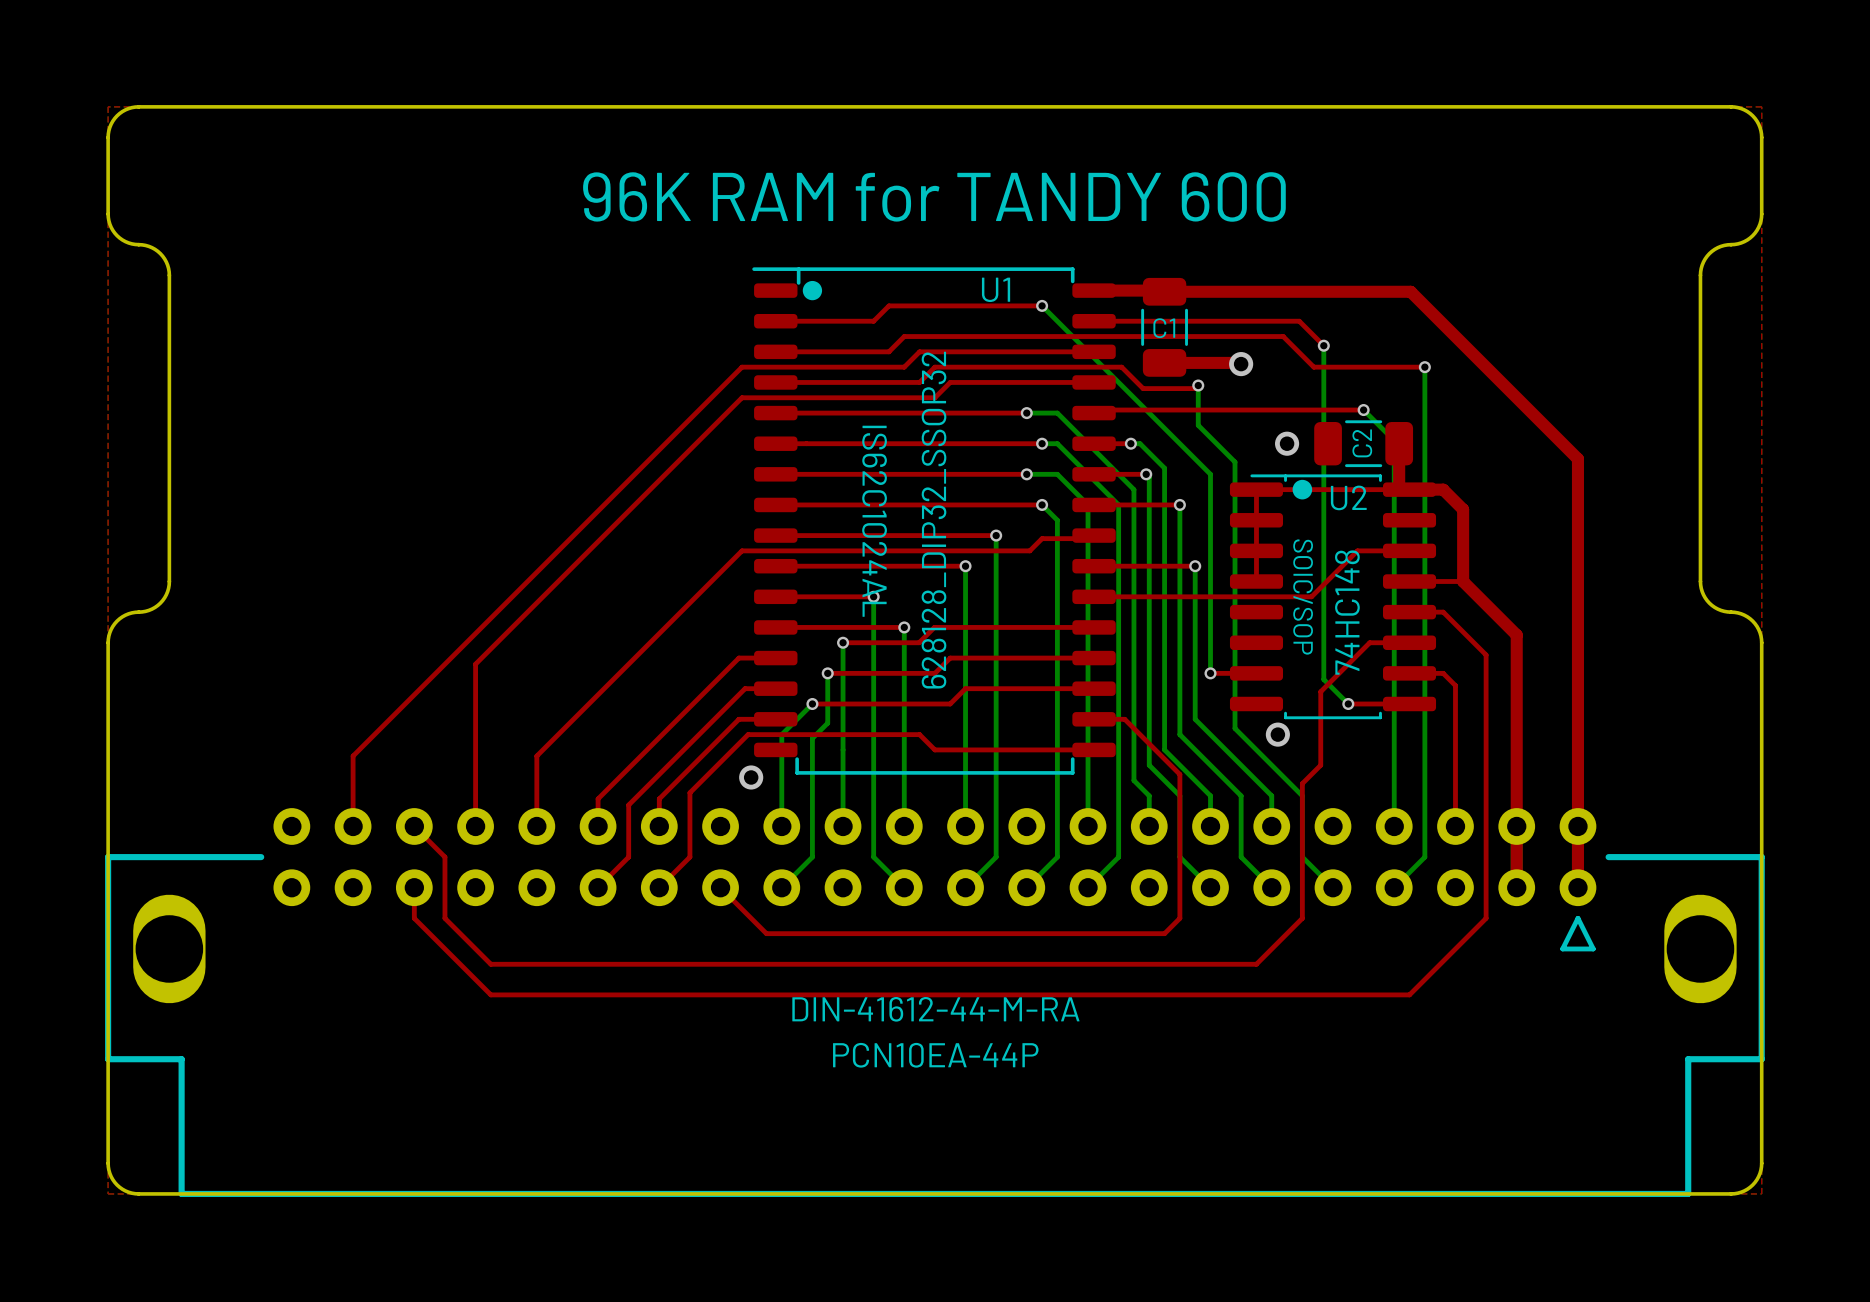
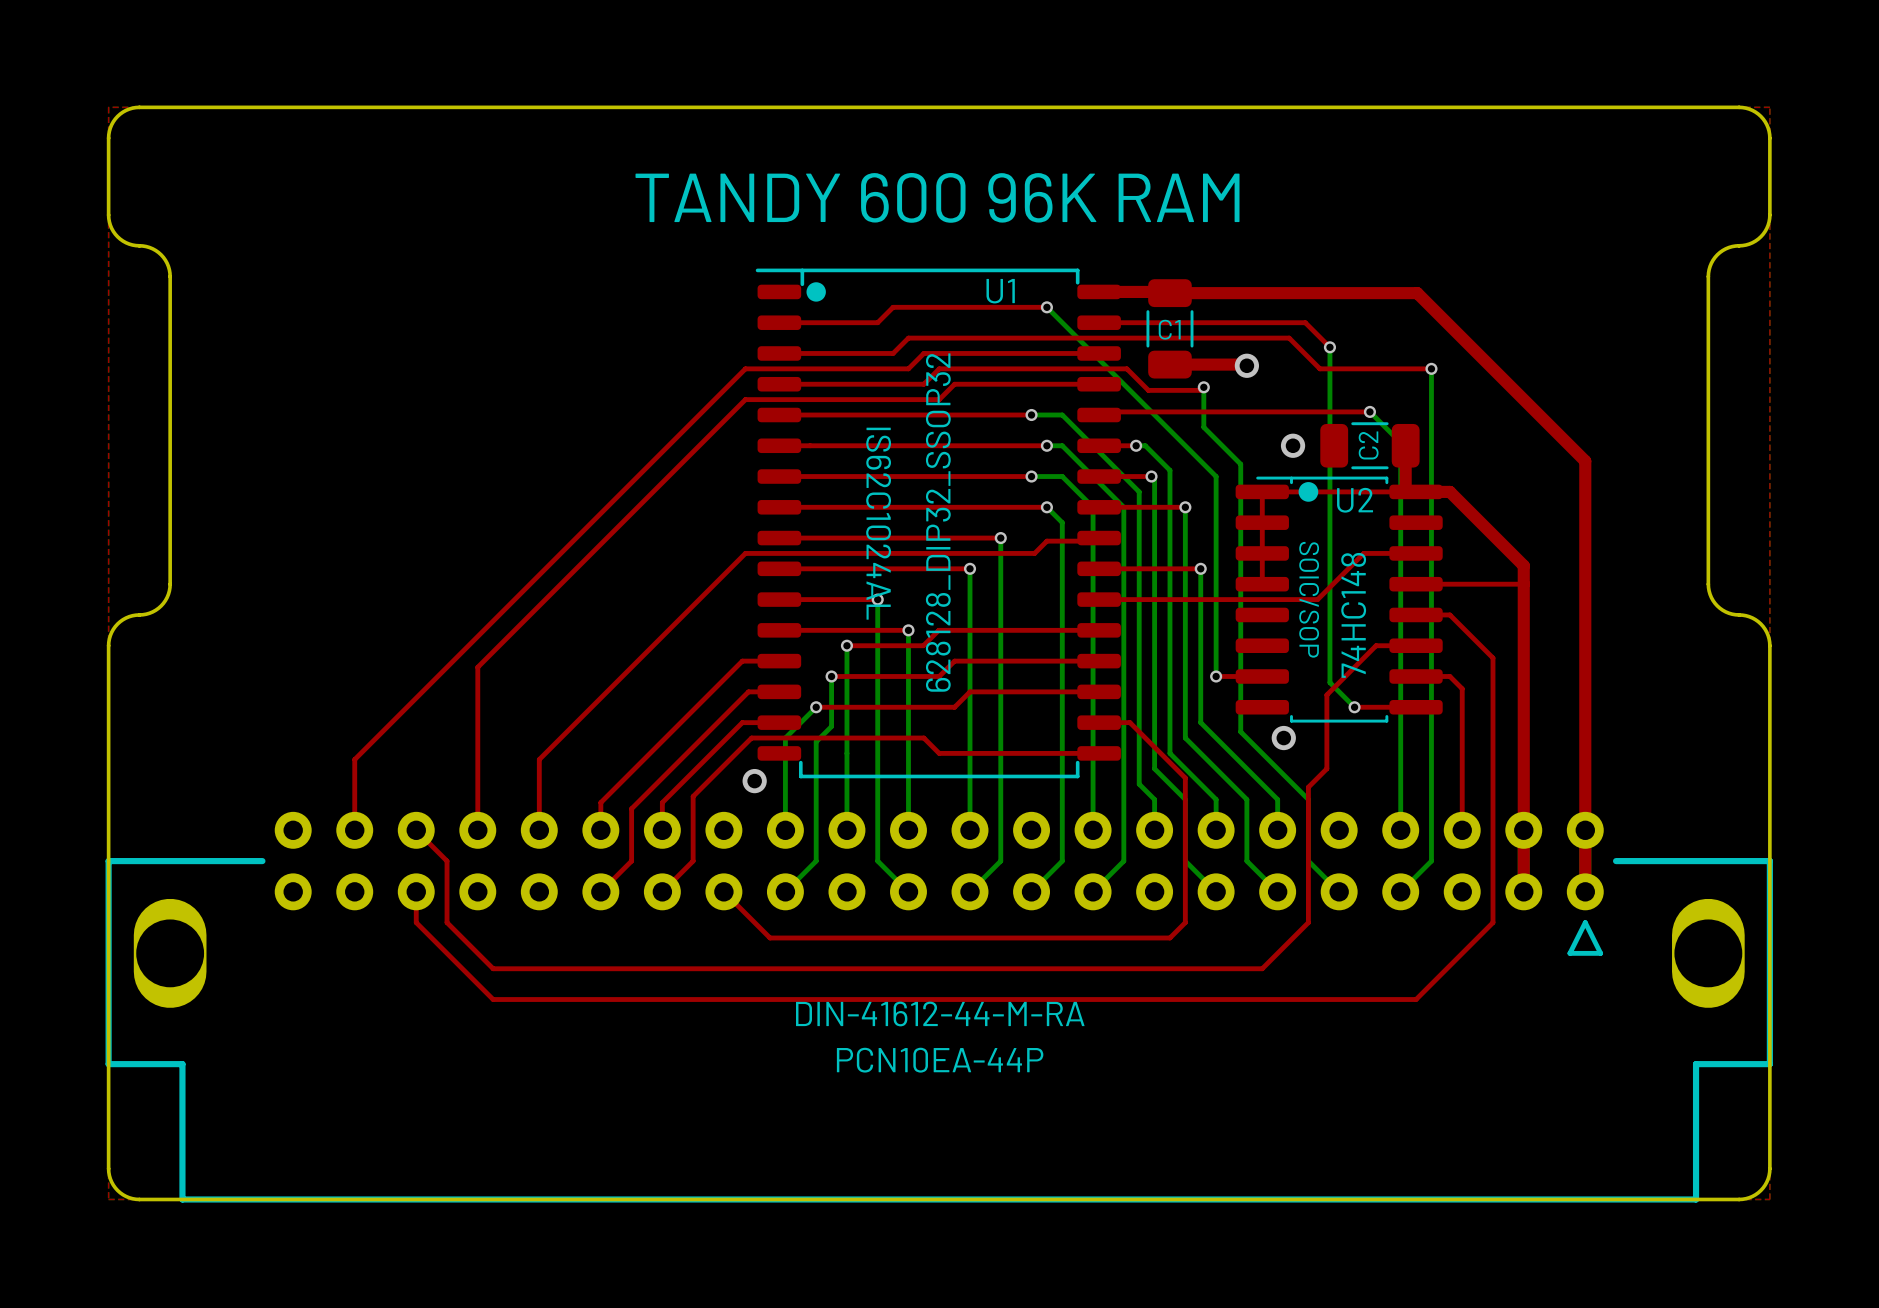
text: 96K RAM for TANDY 600 (934, 196) -> TANDY 600 96K RAM (937, 197)
top track: (1463, 509) (1463, 581) (1516, 635) -> (1469, 511) (1523, 565) (1523, 638)
top track: none -> (1469, 584) (1523, 584)

